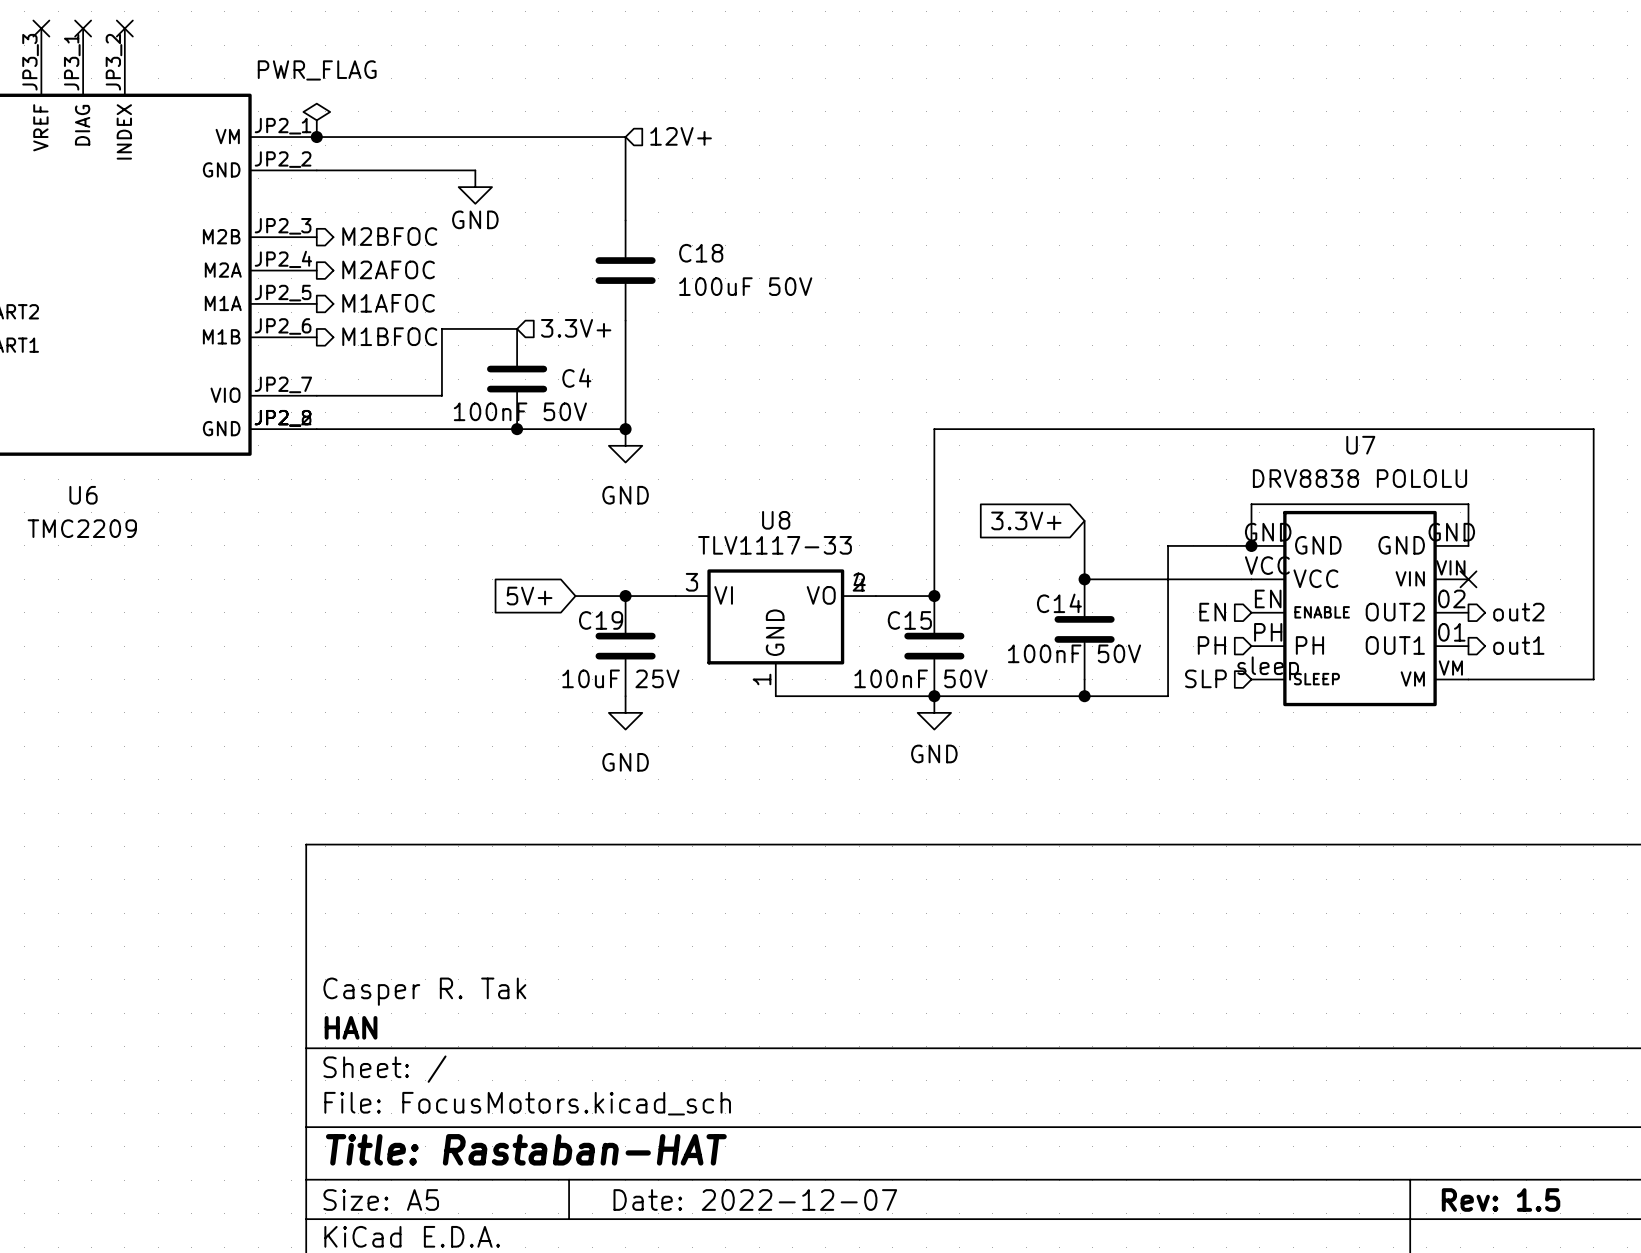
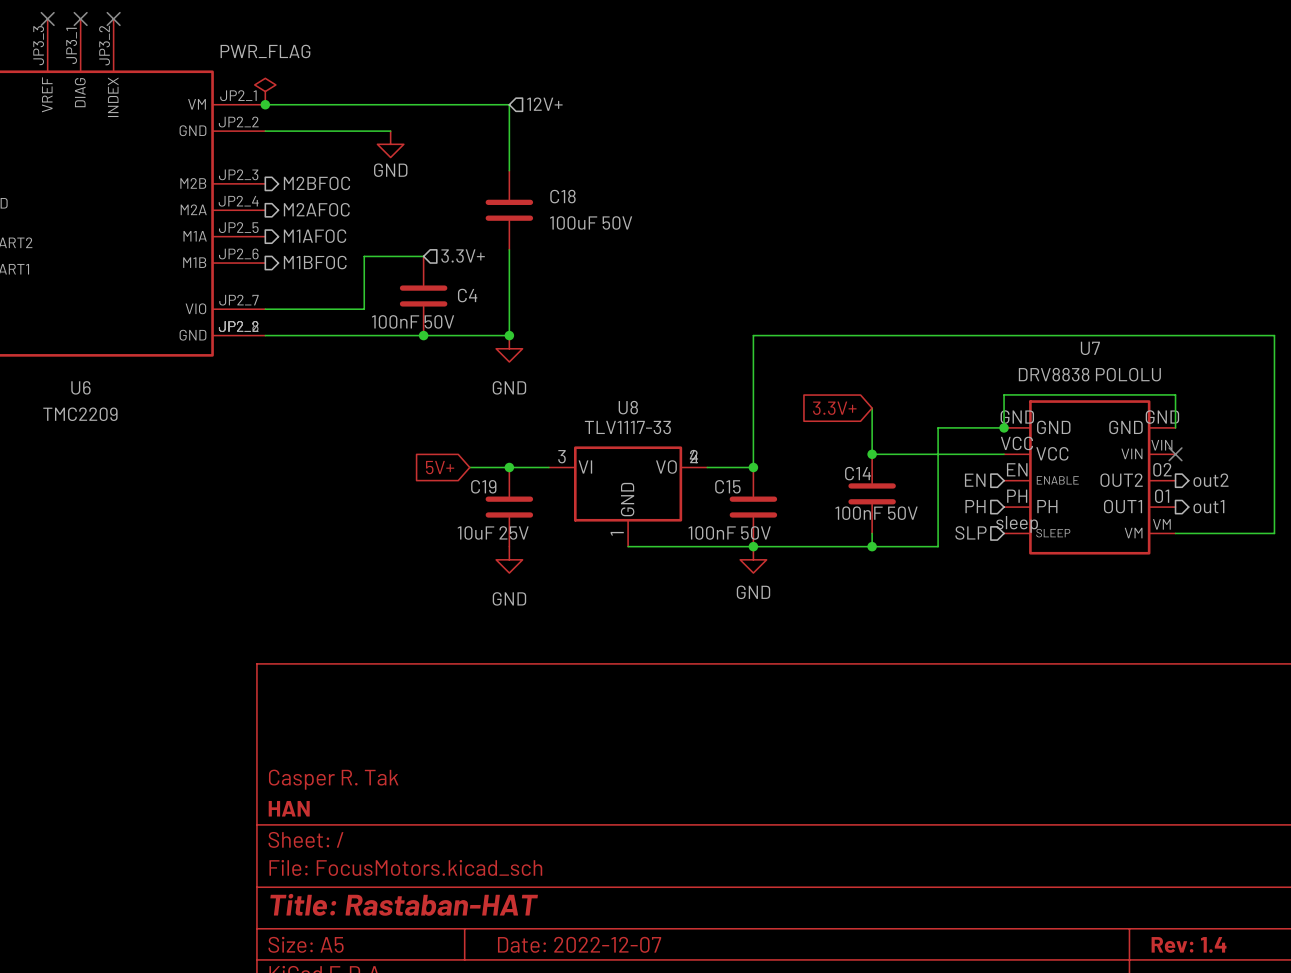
title block: Rev: 1.5 (1501, 1200) -> Rev: 1.4 (1189, 944)

